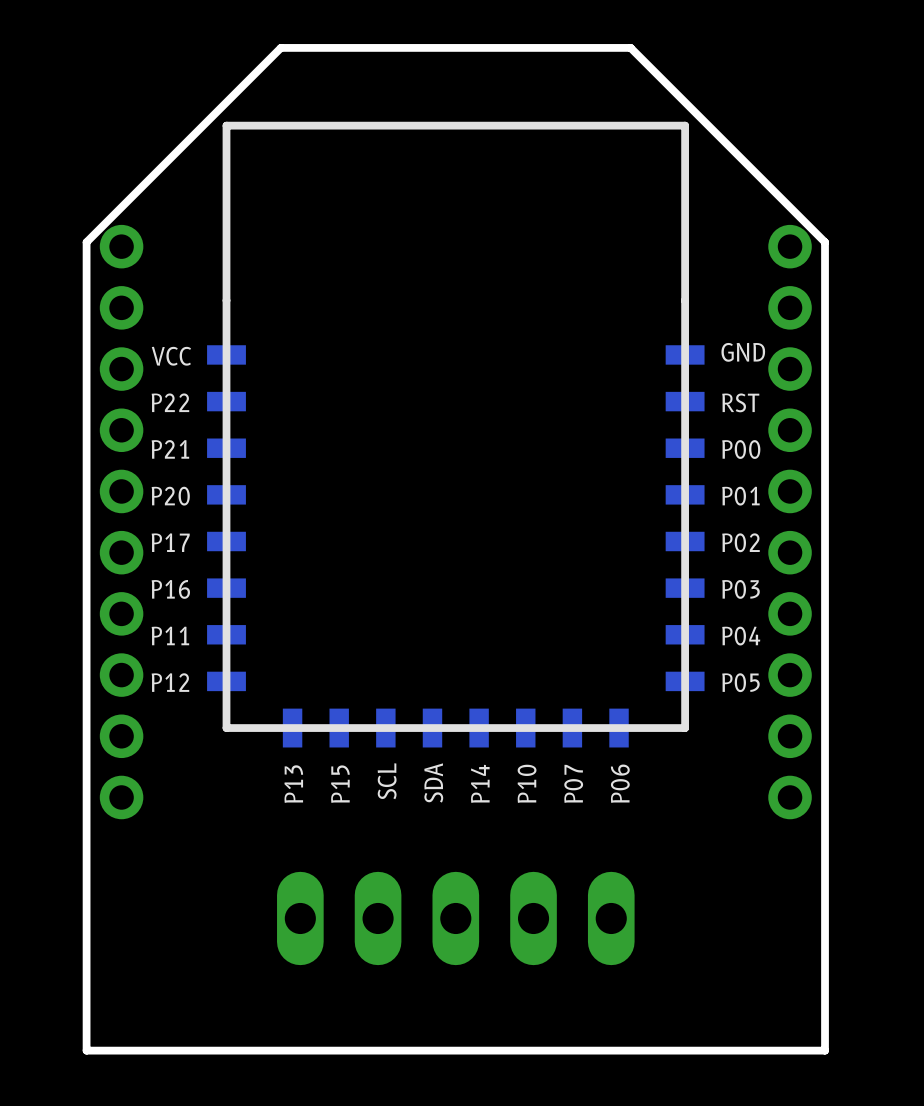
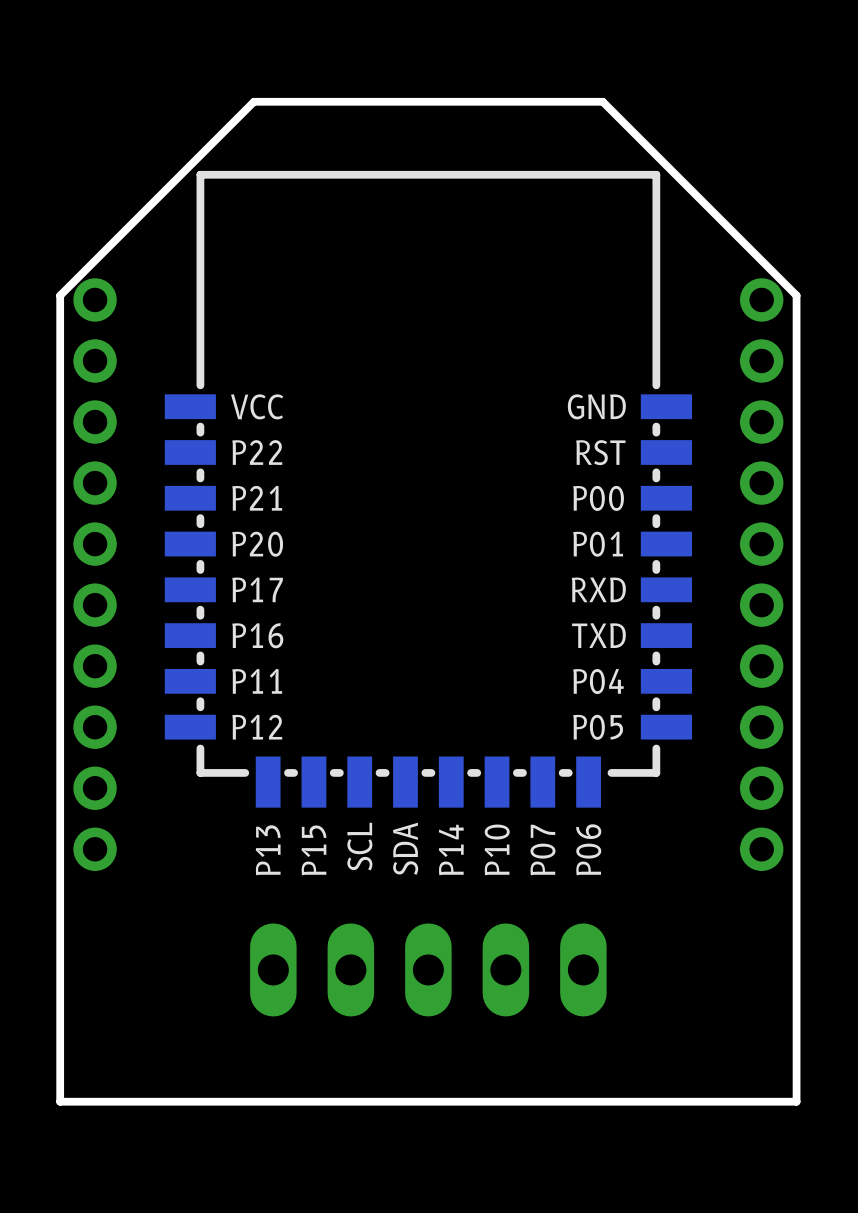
line: (685, 125) (685, 728) (226, 728) (226, 125) (685, 125) -> none
VCC: (226, 354) -> none
GND: (685, 354) -> none
P22: (226, 401) -> none
RST: (685, 401) -> none
part: none -> (428, 489)
P21: (226, 448) -> none
P00: (685, 448) -> none
P20: (226, 494) -> none
P01: (685, 494) -> none
P17: (226, 541) -> none
P02: (685, 541) -> none
P16: (226, 588) -> none
P03: (685, 588) -> none
P11: (226, 634) -> none
P04: (685, 634) -> none
P12: (226, 681) -> none
P05: (685, 681) -> none
P13: (292, 728) -> none
P15: (339, 728) -> none
SCL: (385, 728) -> none
SDA: (432, 728) -> none
P14: (479, 728) -> none
P10: (525, 728) -> none
P07: (572, 728) -> none
P06: (619, 728) -> none

